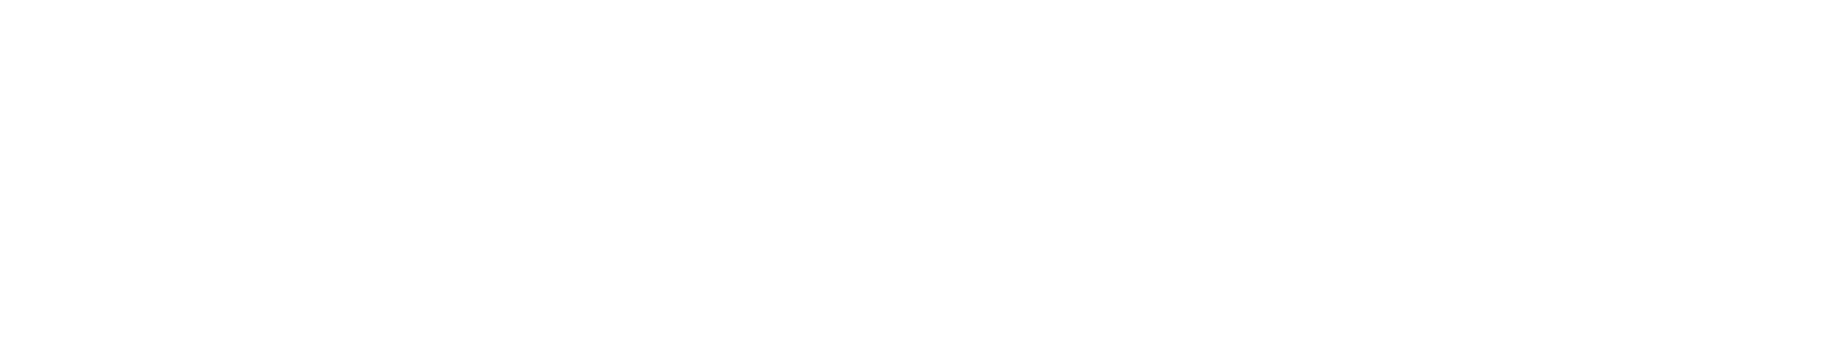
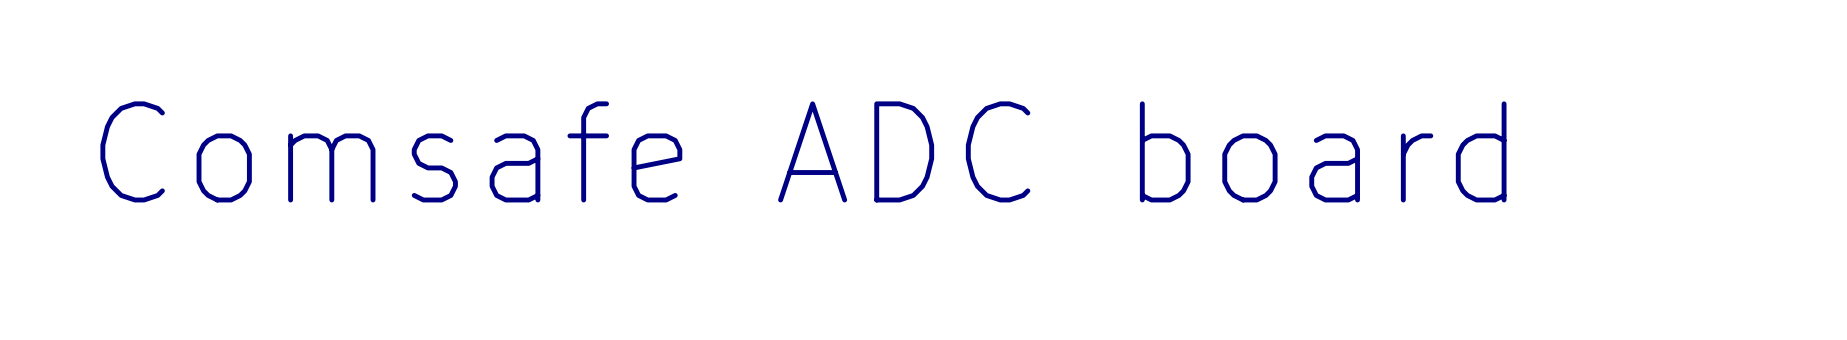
text: none -> Comsafe ADC board (803, 151)

